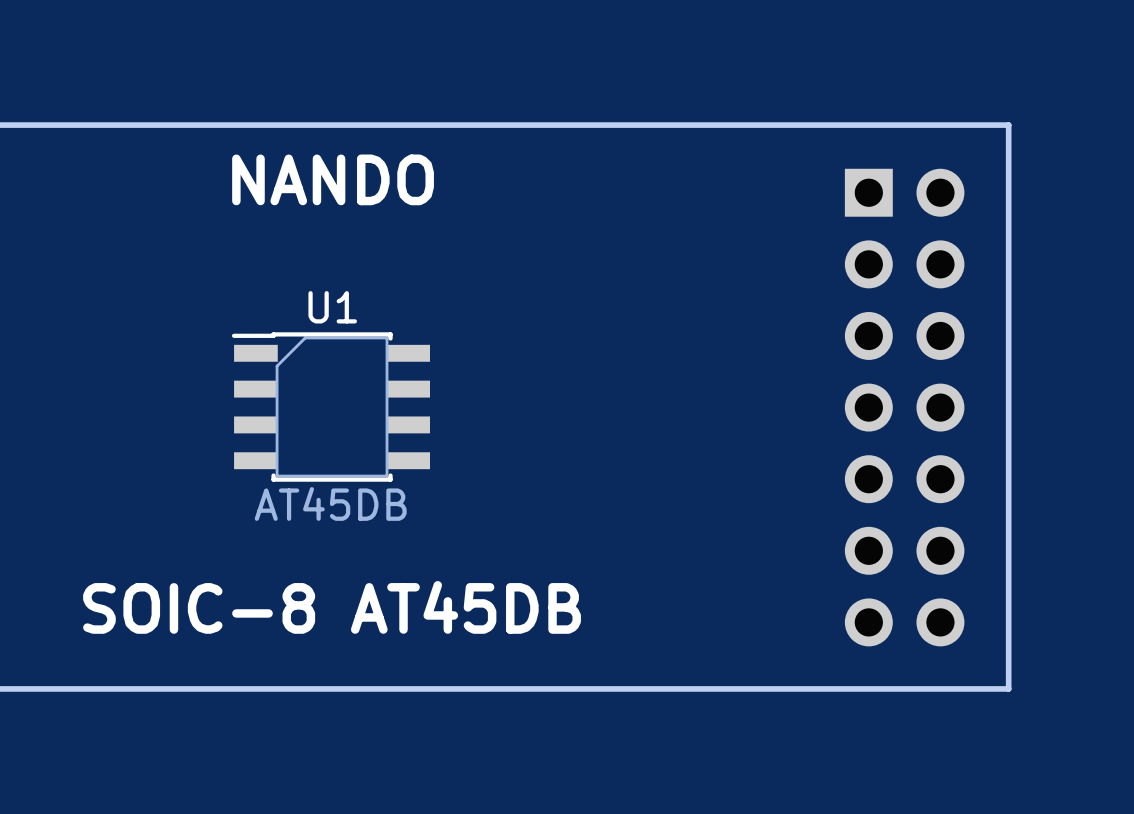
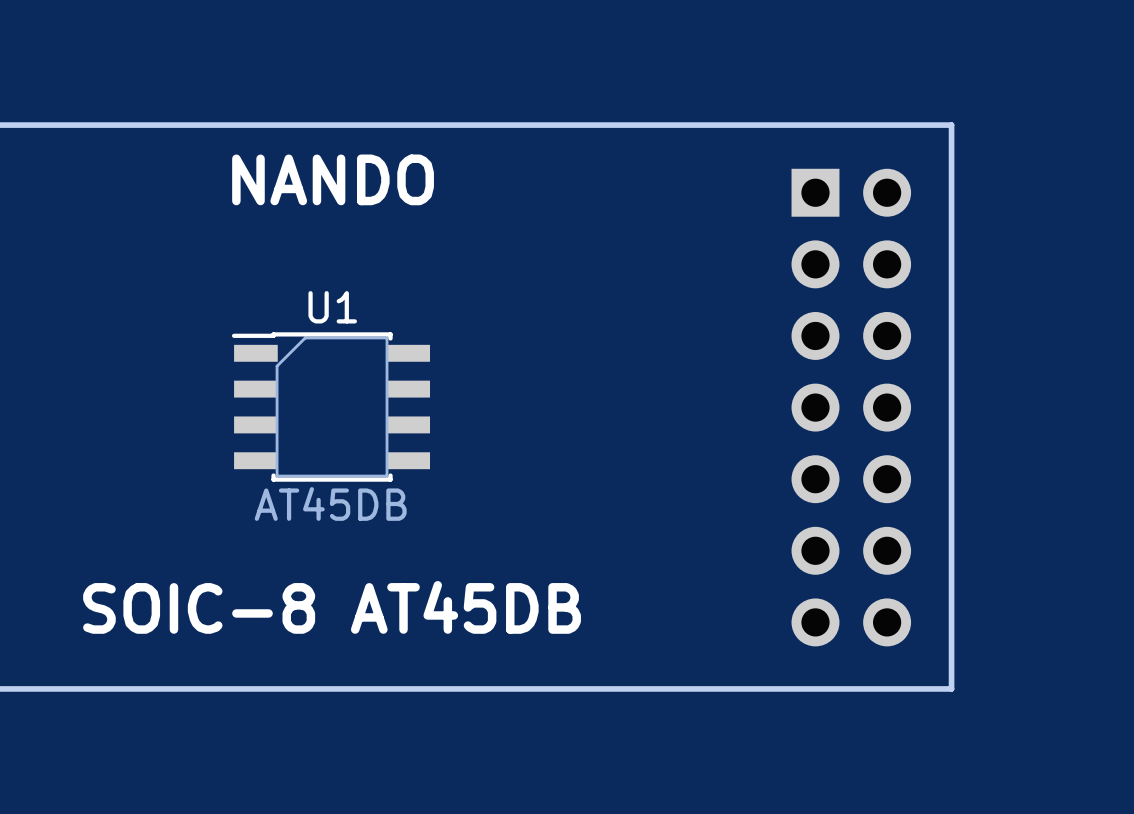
board edge: (951, 125) (1008, 125) (1008, 688) (951, 688) -> (951, 125) (951, 688)
part position: (904, 407) -> (851, 407)

